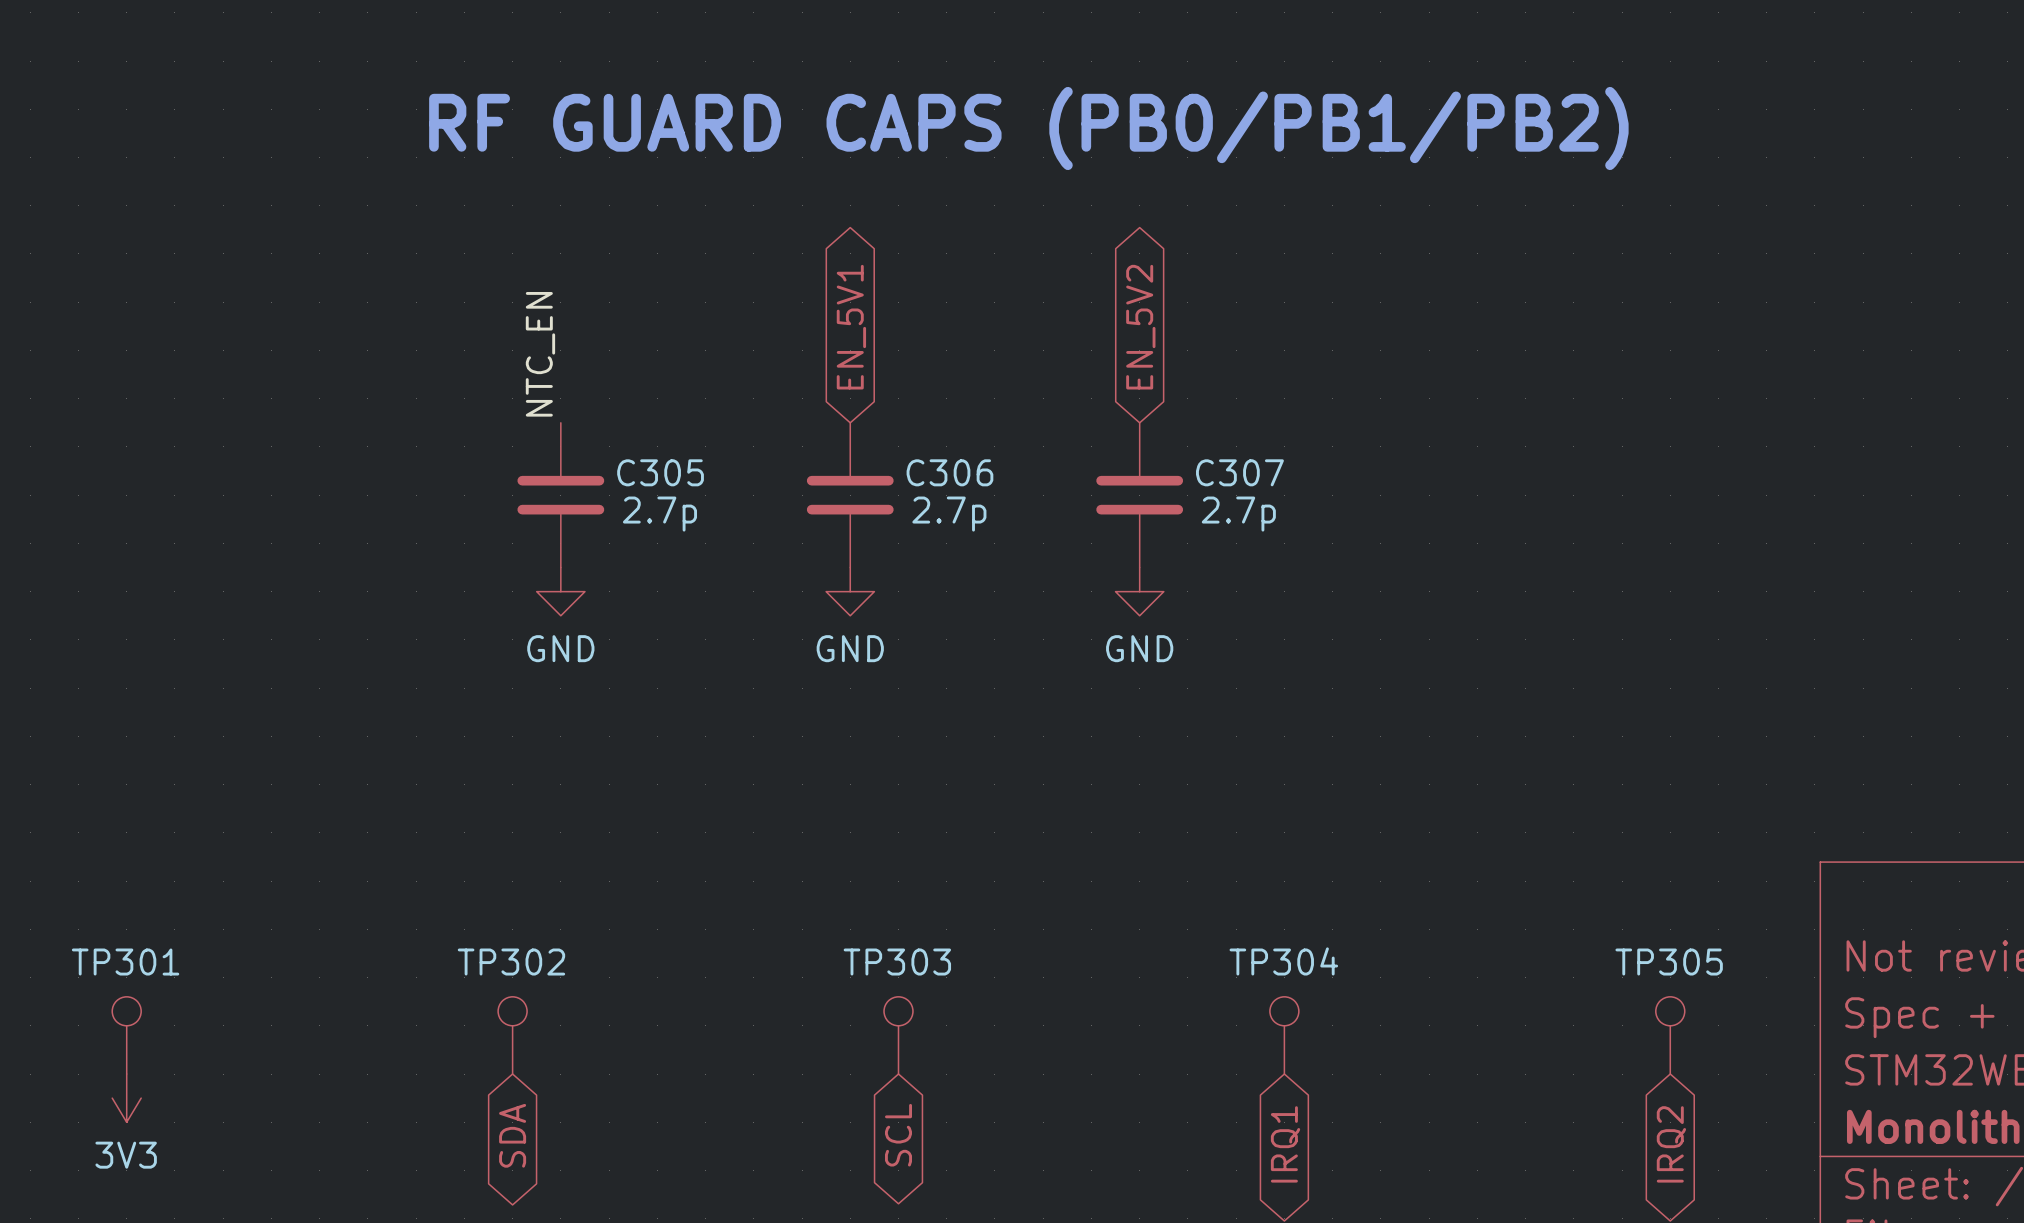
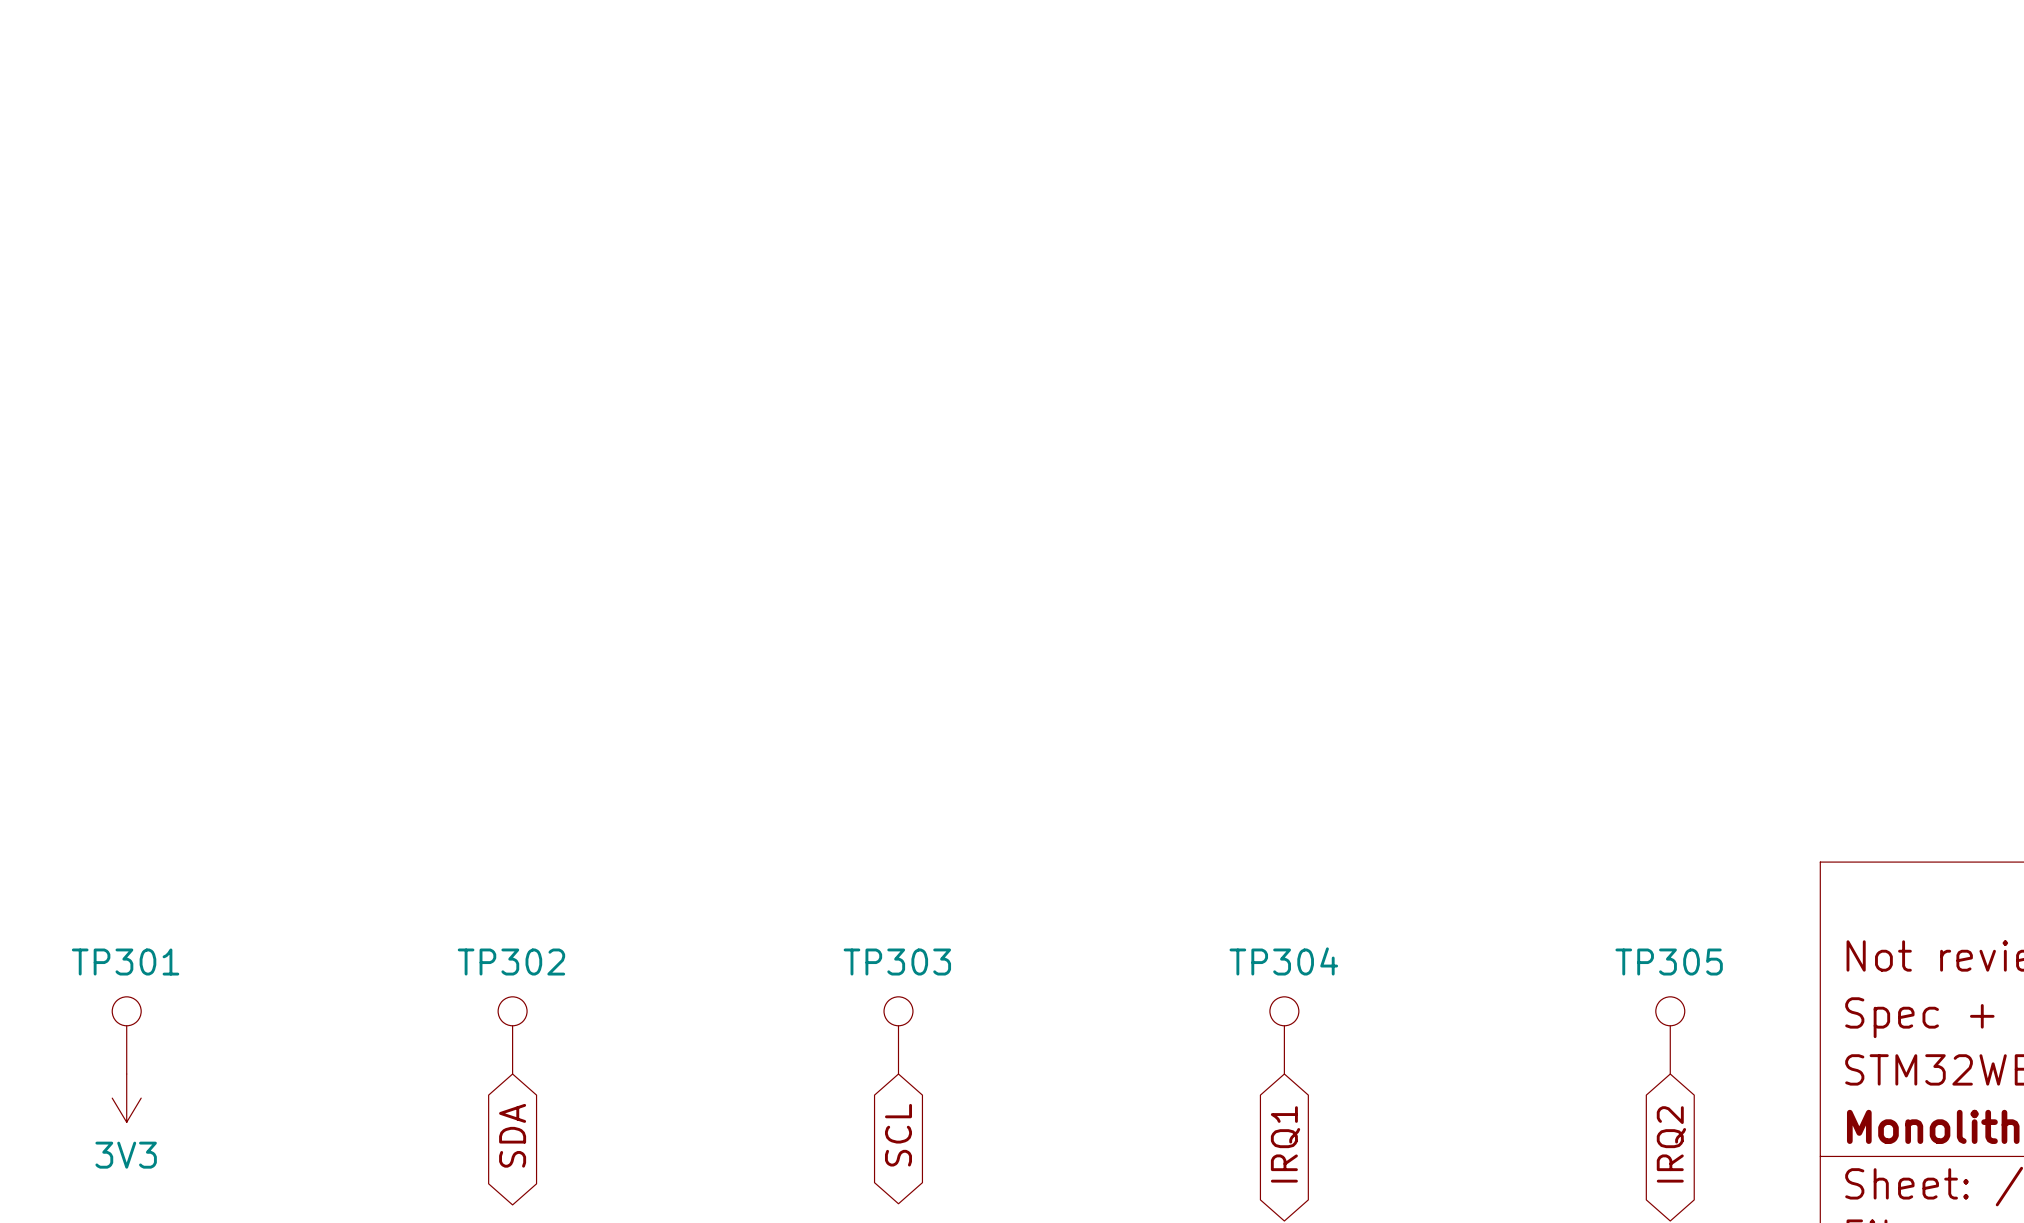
text: RF GUARD CAPS (PB0/PB1/PB2) (1028, 128) -> none
global label: EN_5V1 (851, 327) -> none
global label: EN_5V2 (1140, 327) -> none
label: NTC_EN (540, 354) -> none
C305: 2.7p (560, 495) -> none
C306: 2.7p (850, 495) -> none
C307: 2.7p (1139, 495) -> none
power symbol: GND (560, 591) -> none
power symbol: GND (850, 591) -> none
power symbol: GND (1139, 591) -> none

